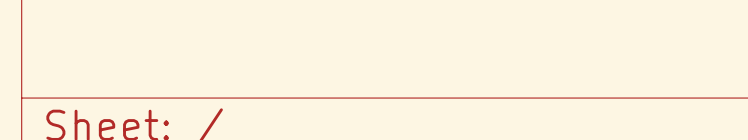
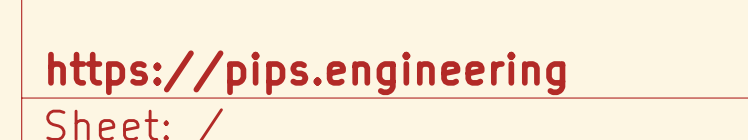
title block: none -> https://pips.engineering (306, 72)

